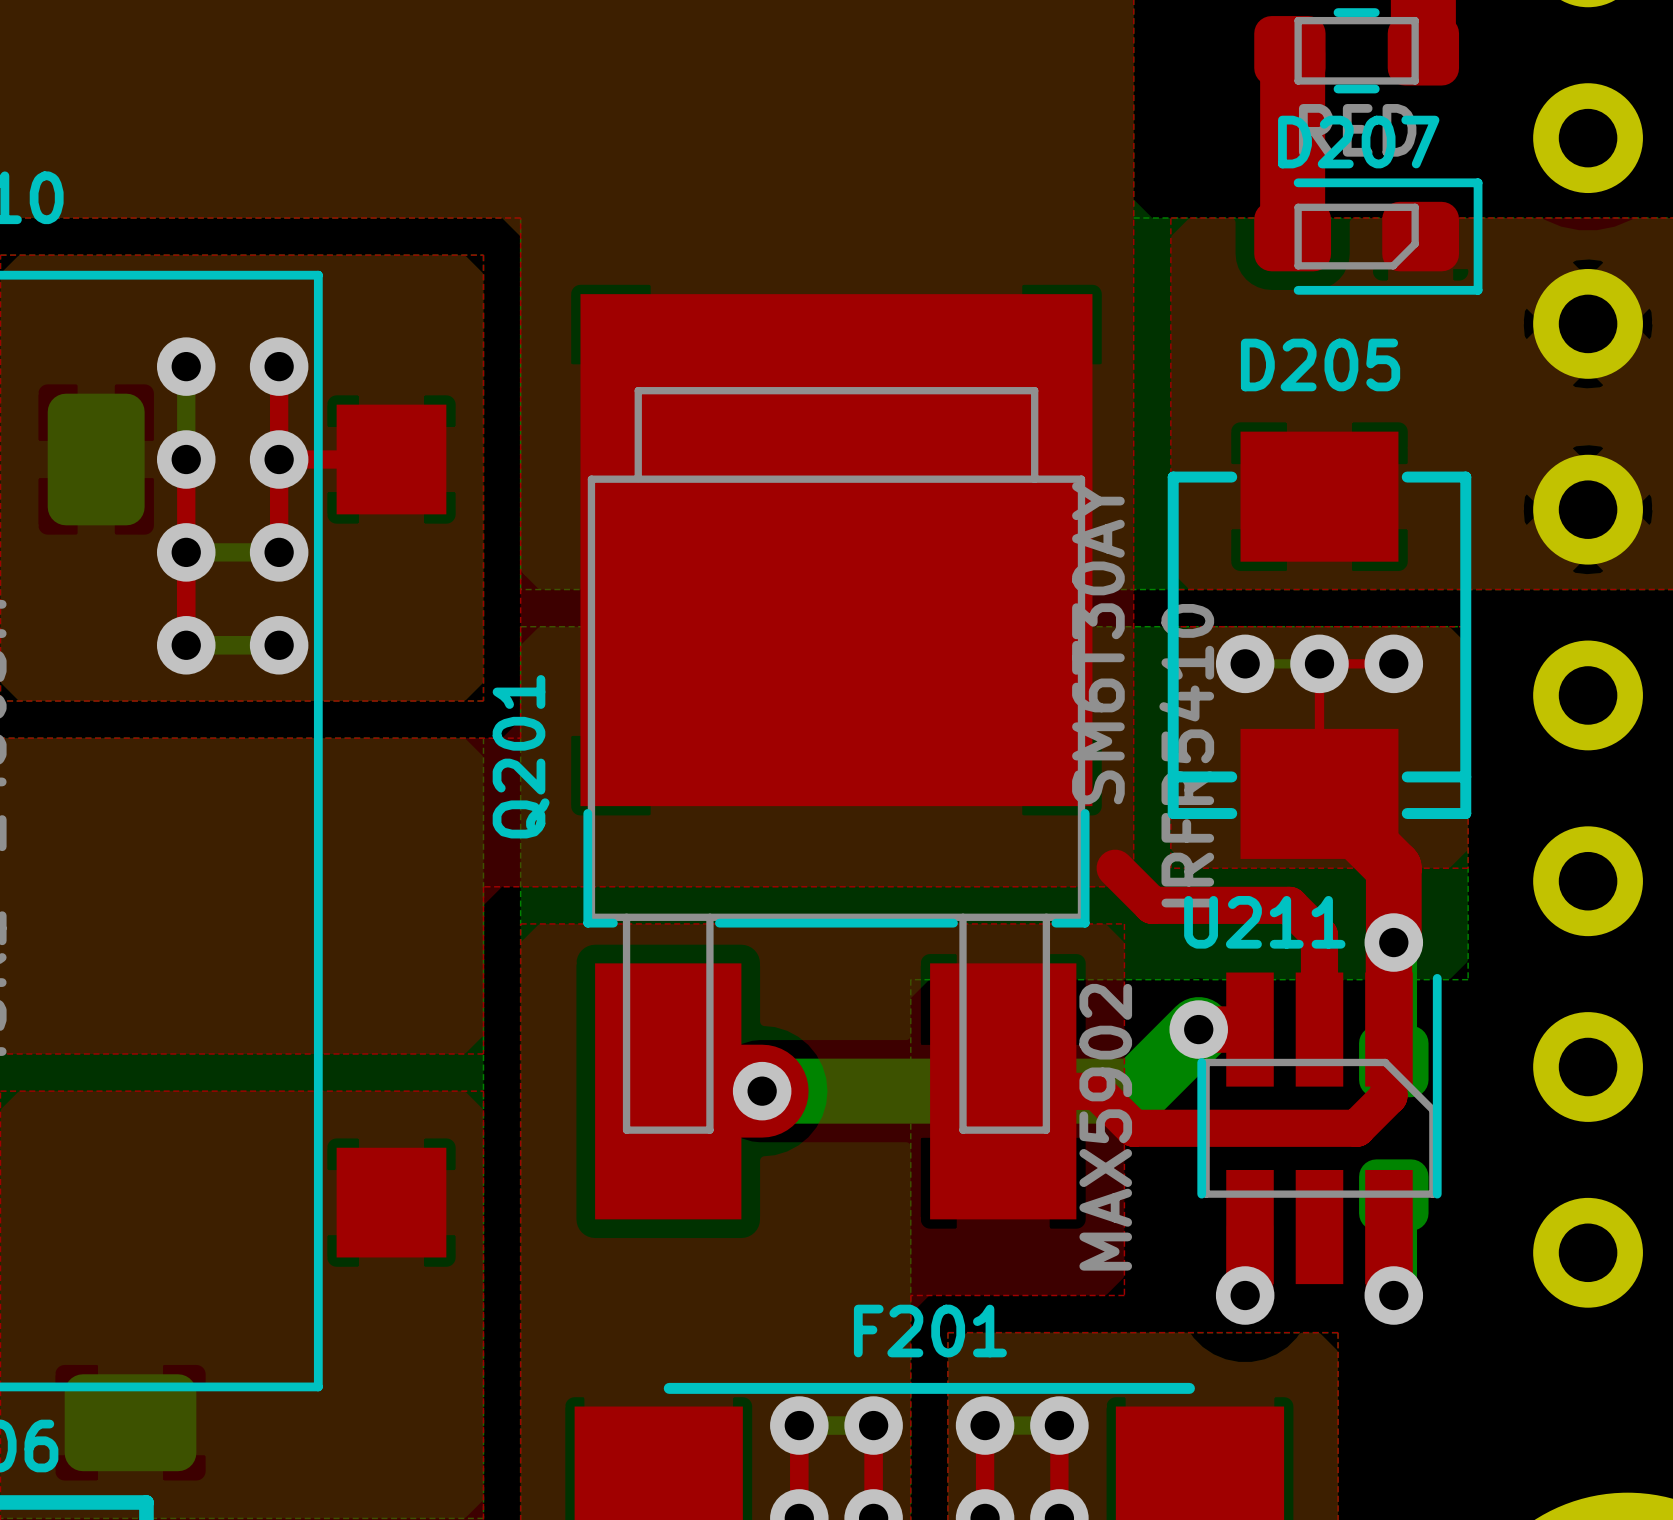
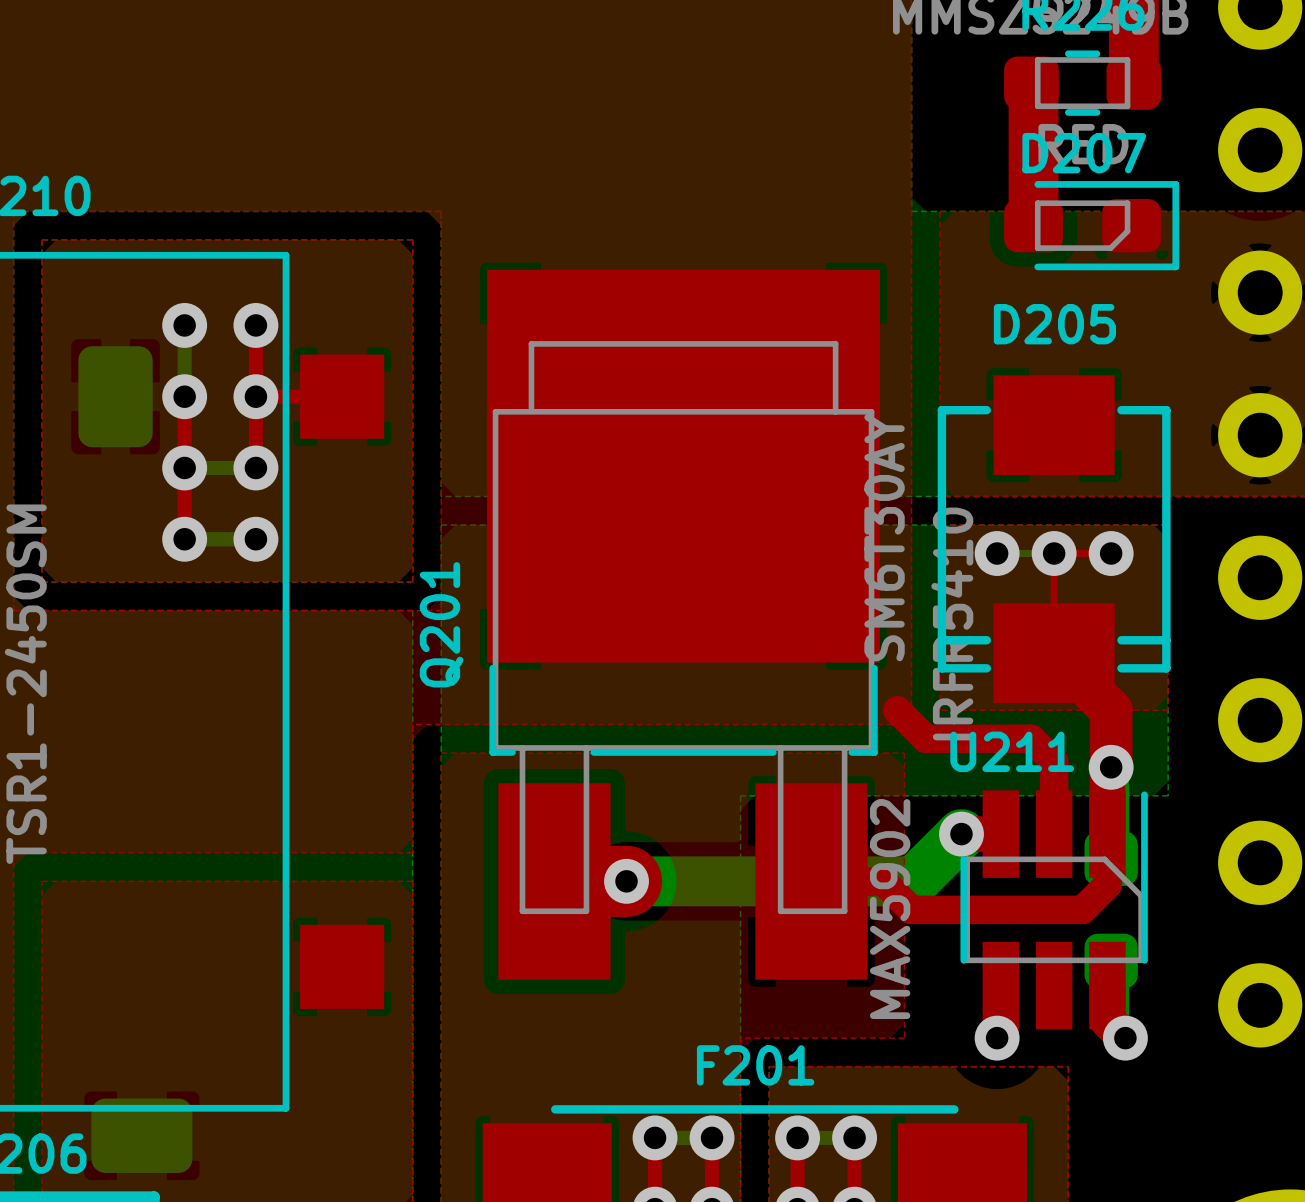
via position: (1393, 1295) -> (1125, 1038)

